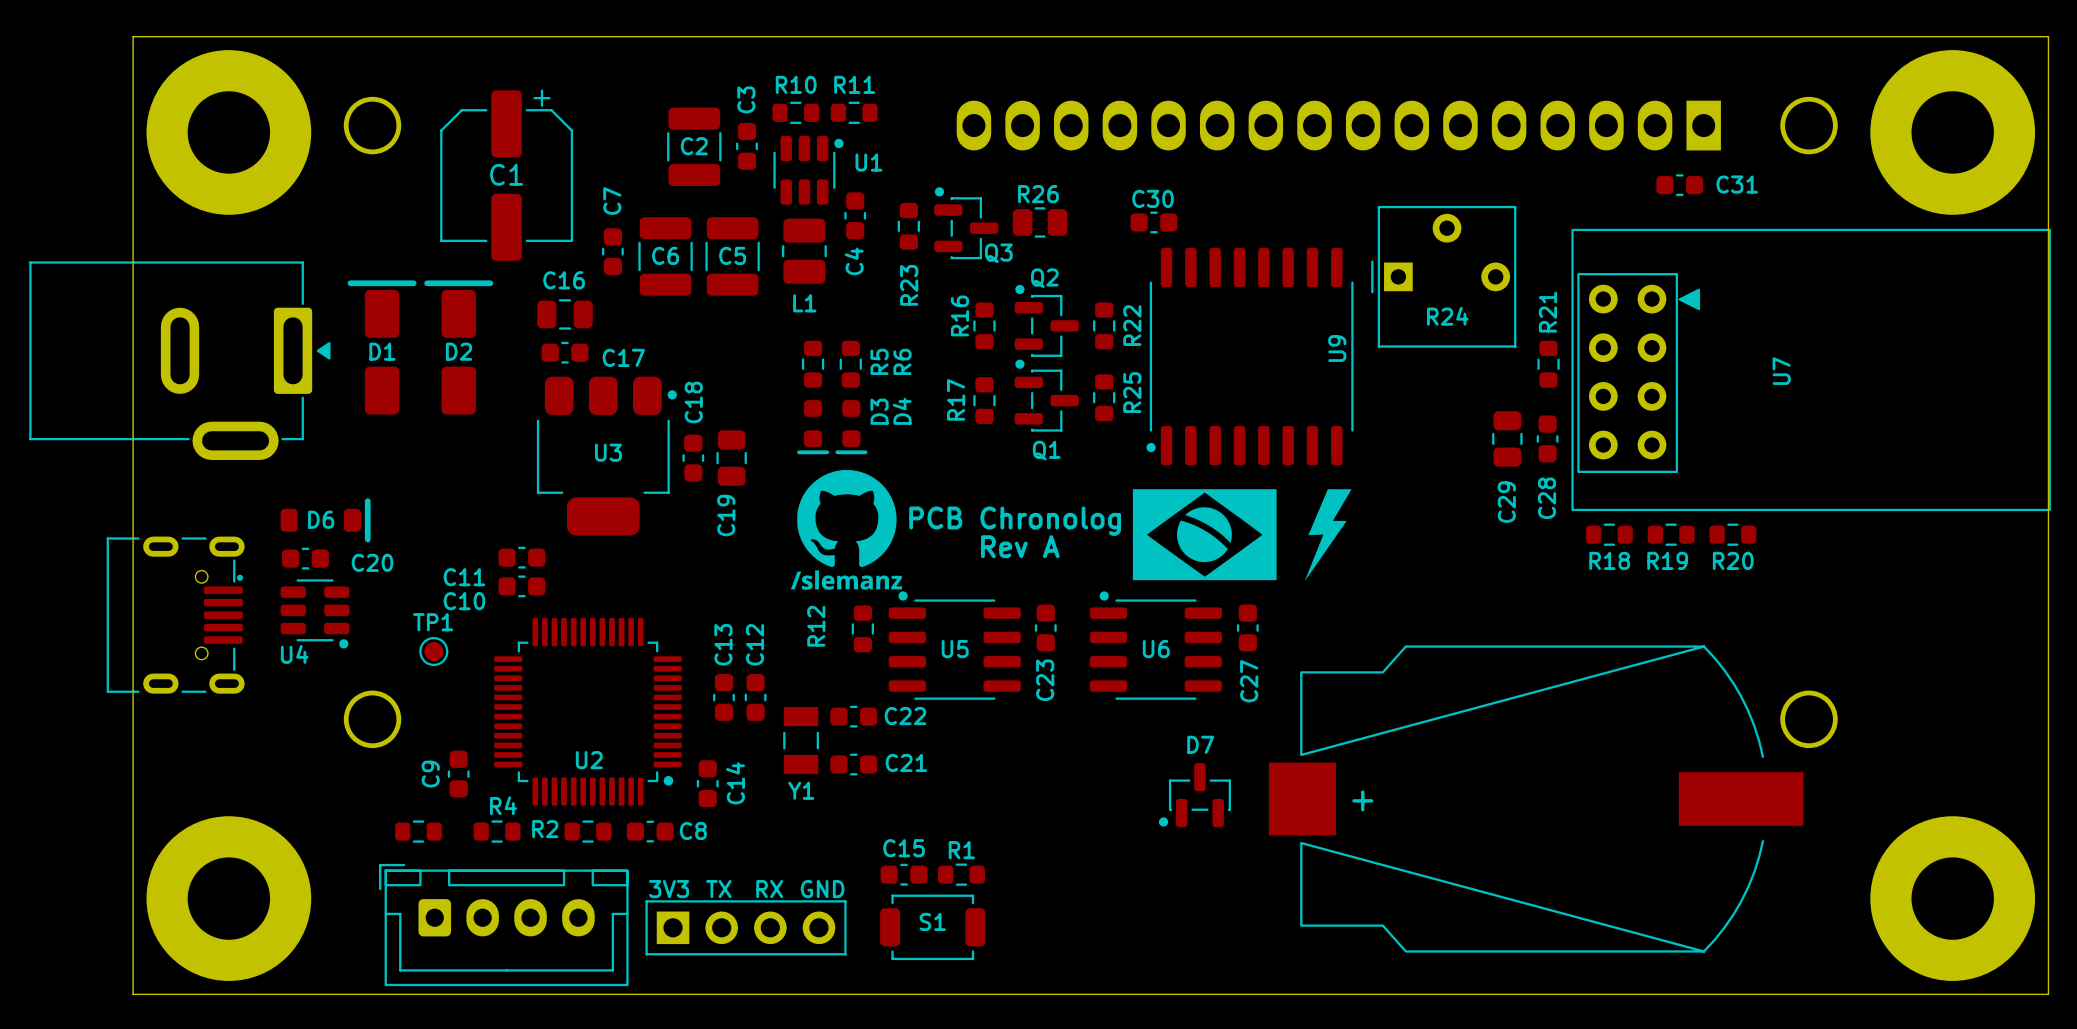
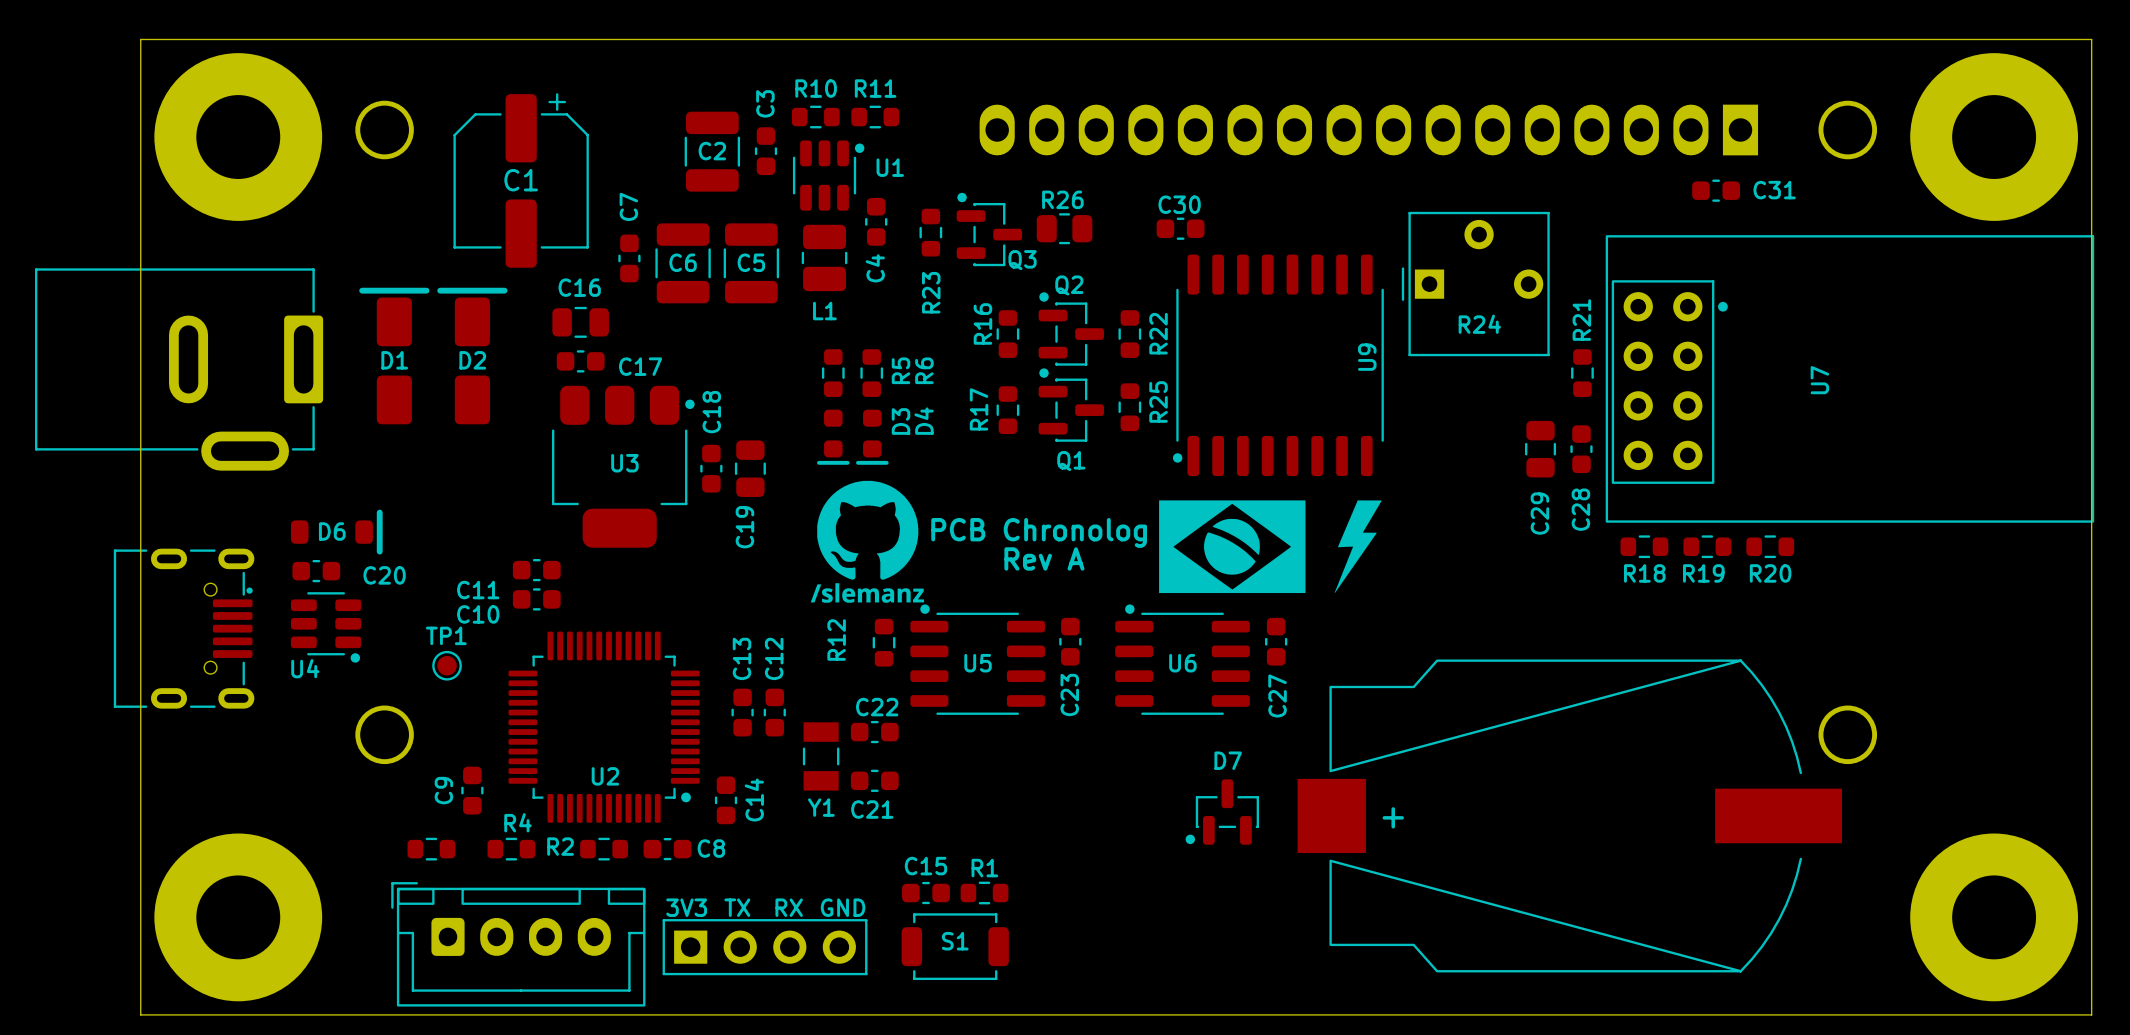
U7 footprint: [1571, 228, 2051, 512] -> [1605, 235, 2095, 523]
part footprint: [29, 261, 331, 460] -> [34, 268, 324, 471]
C22 name position: C22 (905, 716) -> C22 (877, 707)
C21 name position: C21 (906, 762) -> C21 (872, 809)

